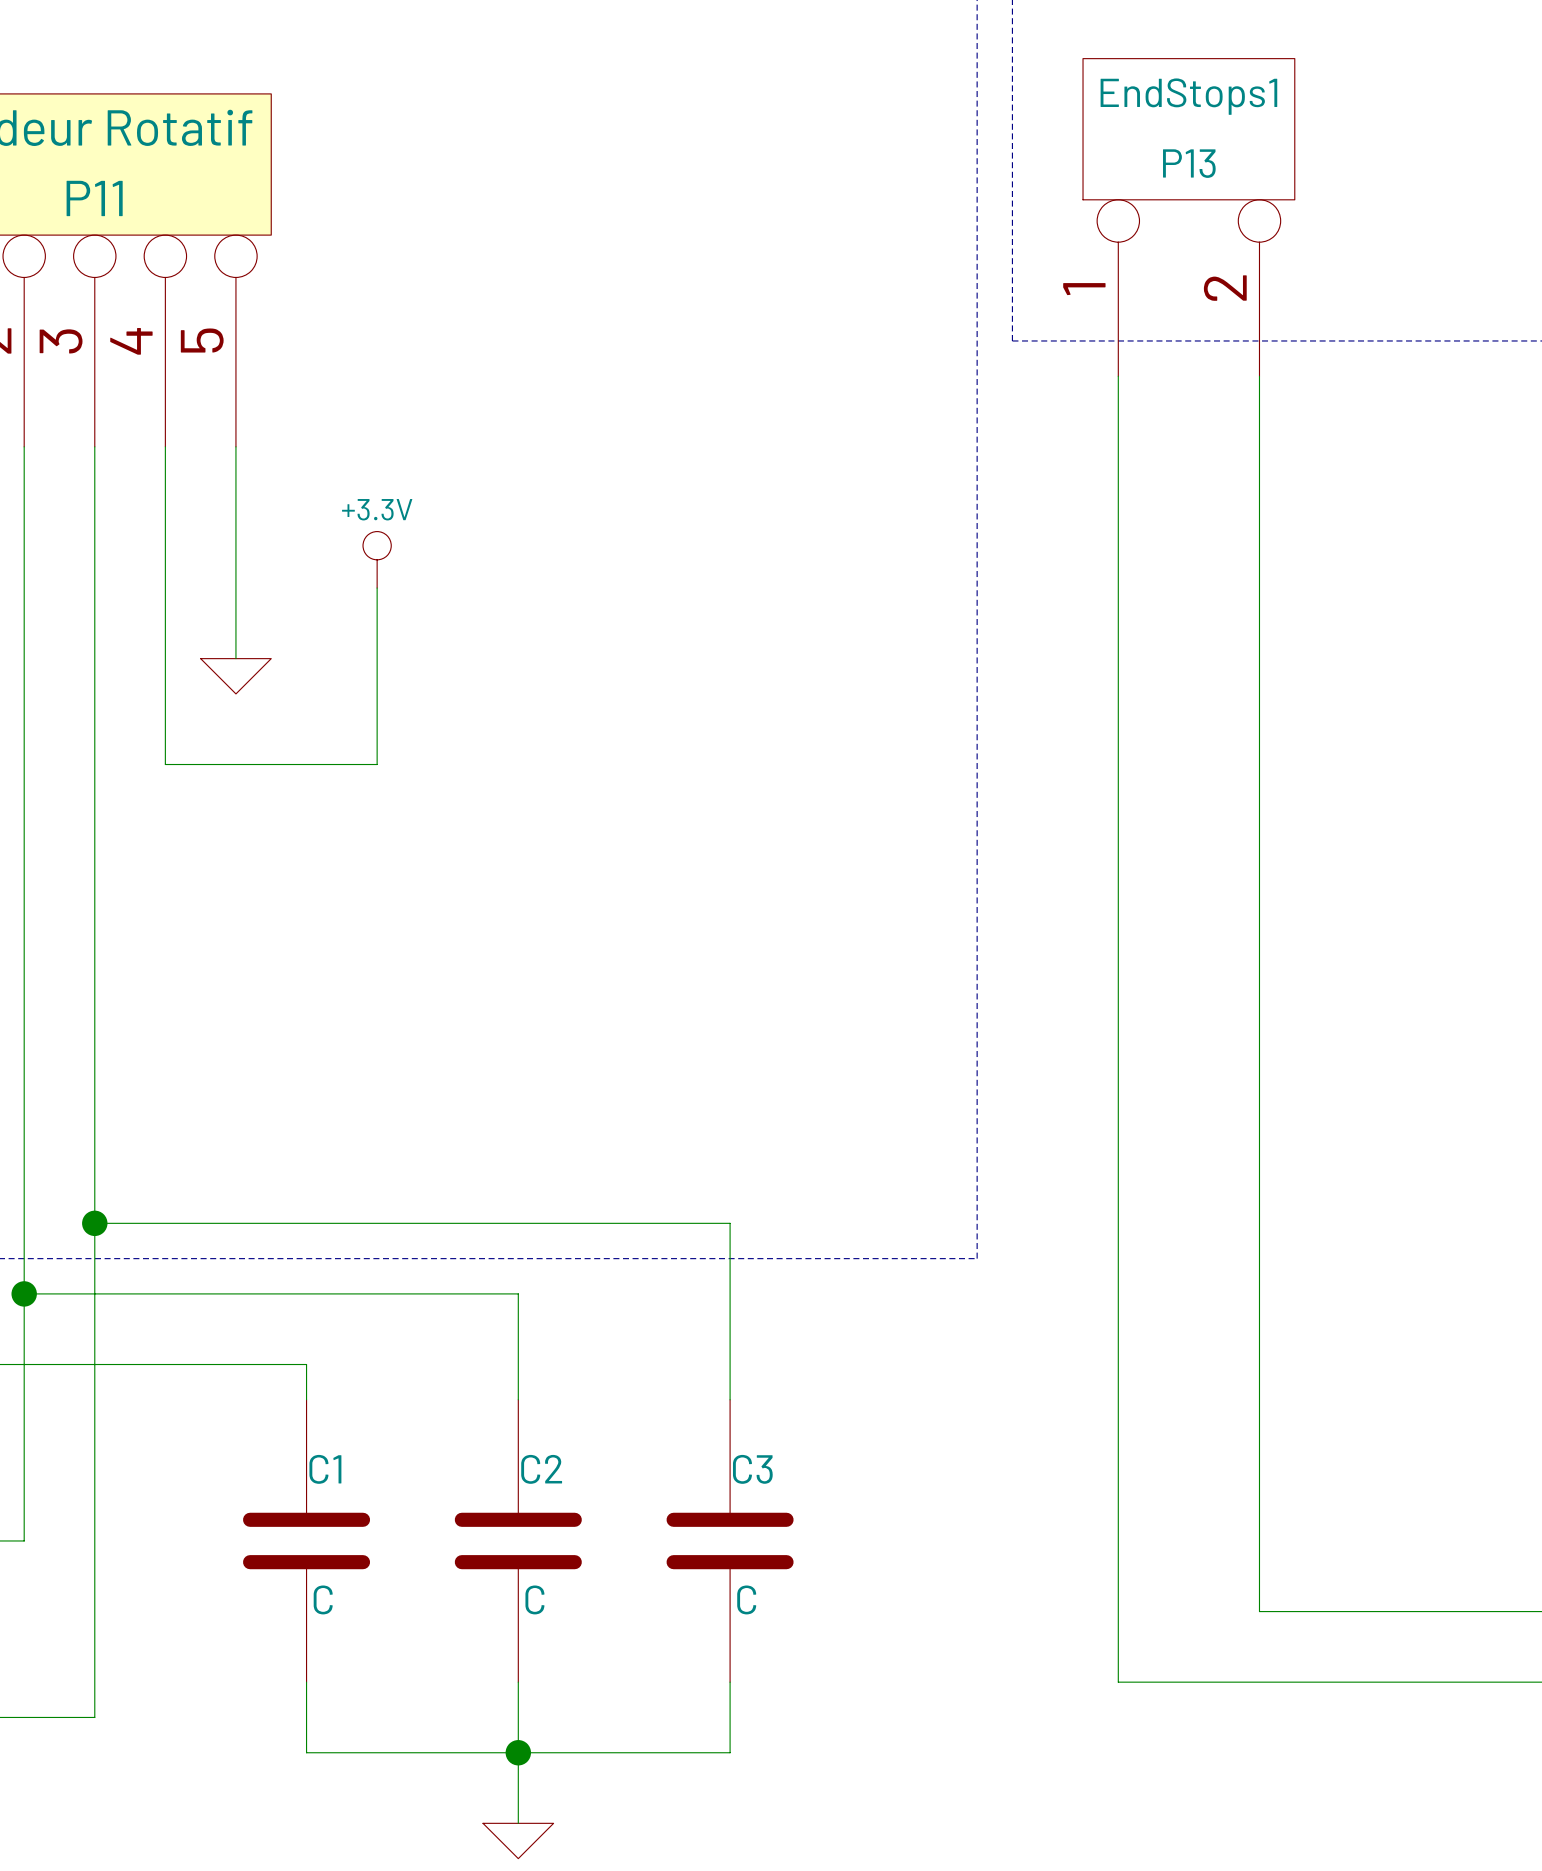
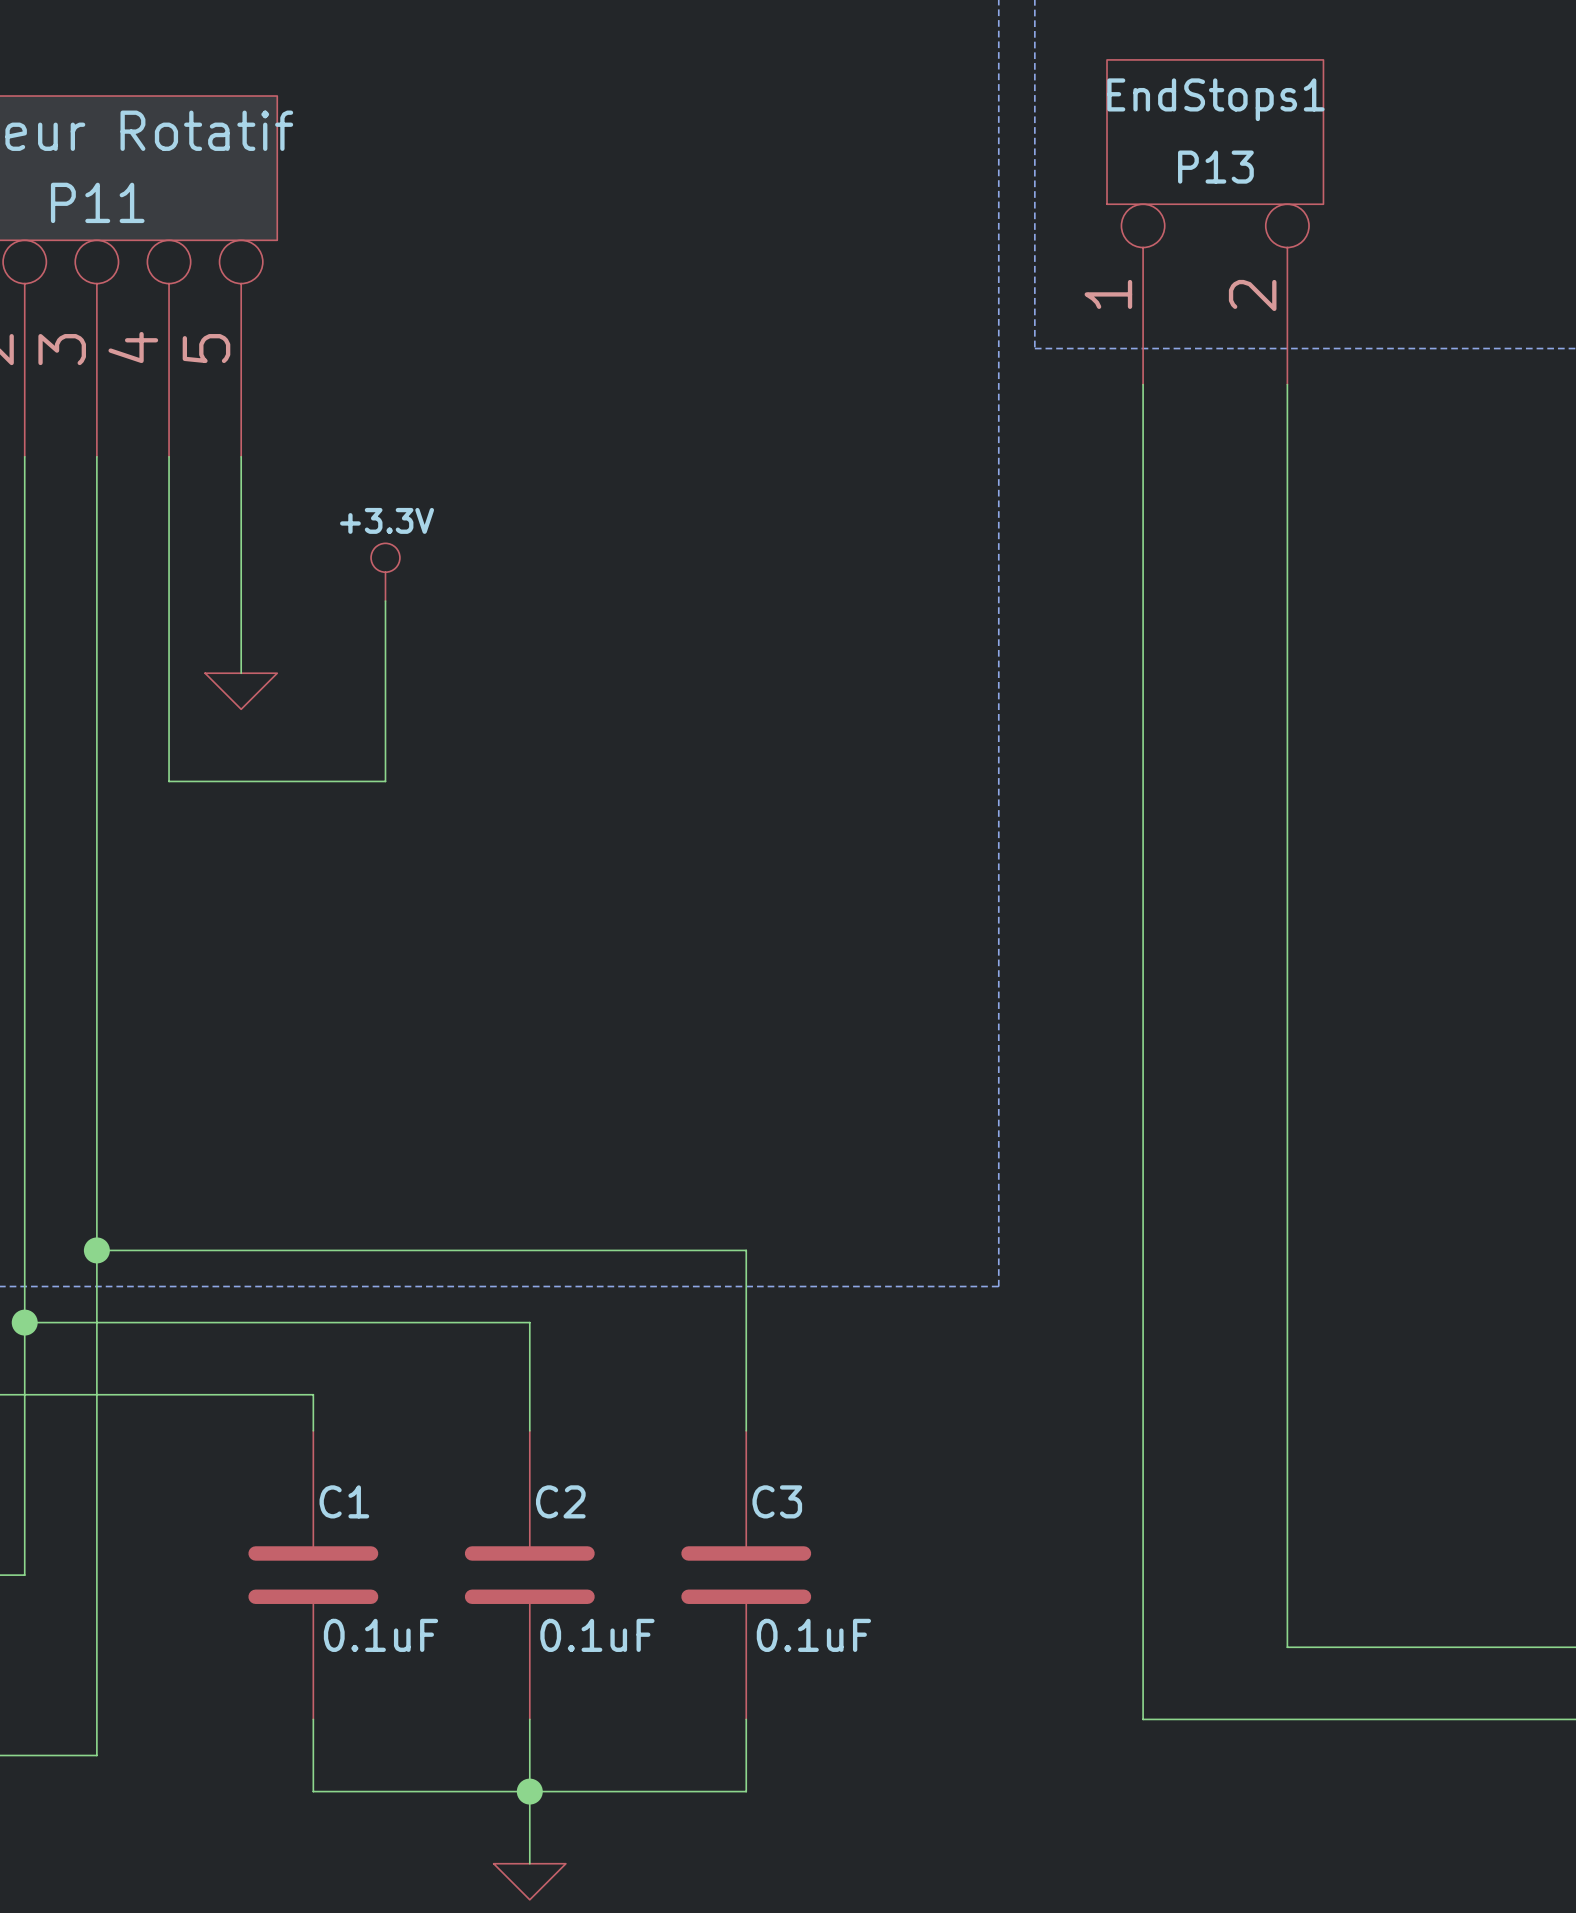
C1 value: C (323, 1599) -> 0.1uF (380, 1635)
C2 value: C (534, 1599) -> 0.1uF (597, 1635)
C3 value: C (746, 1599) -> 0.1uF (813, 1635)

